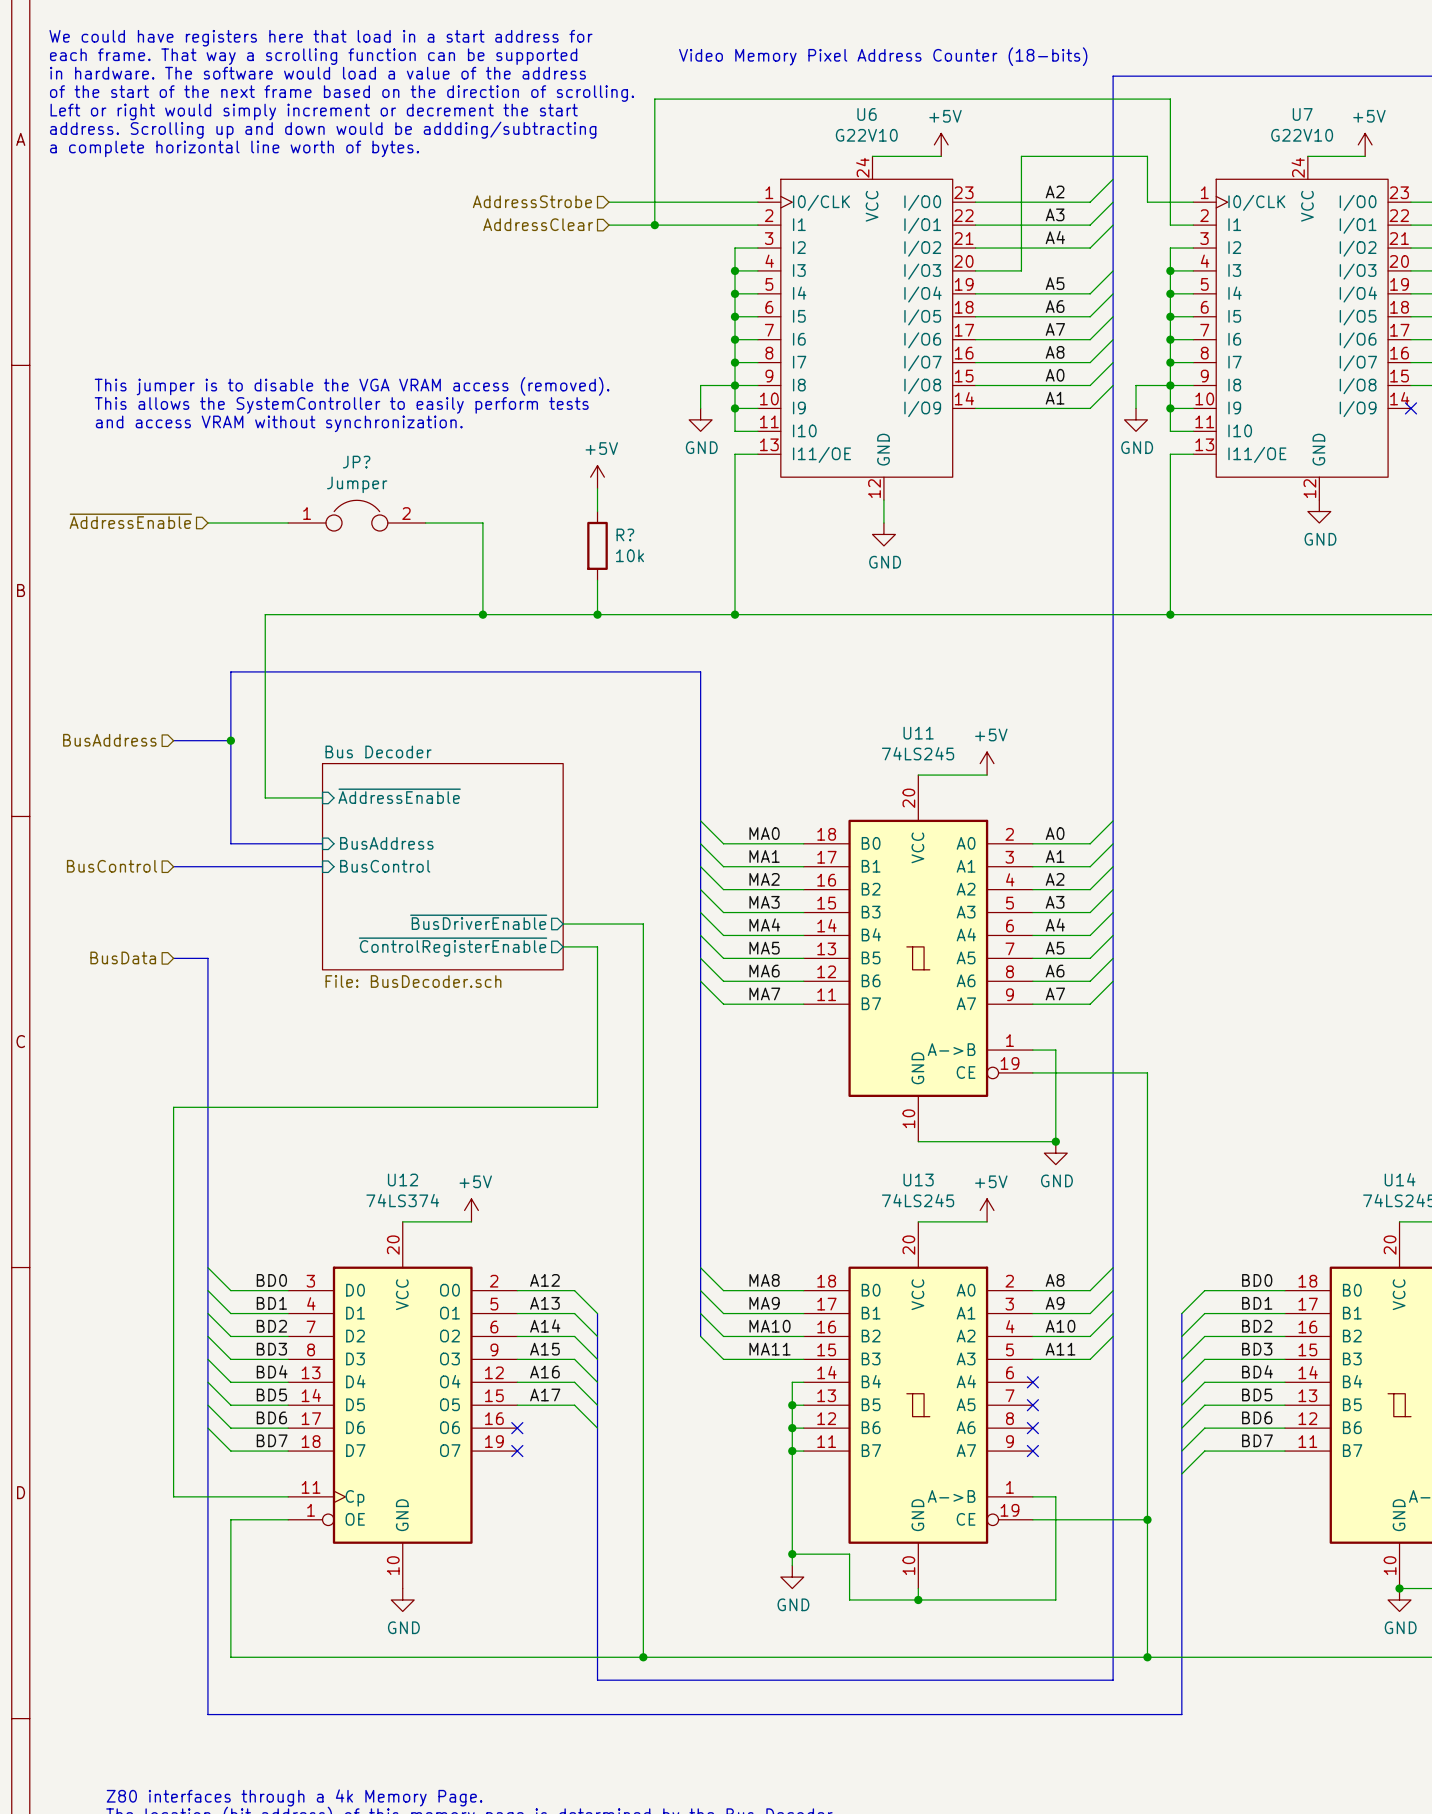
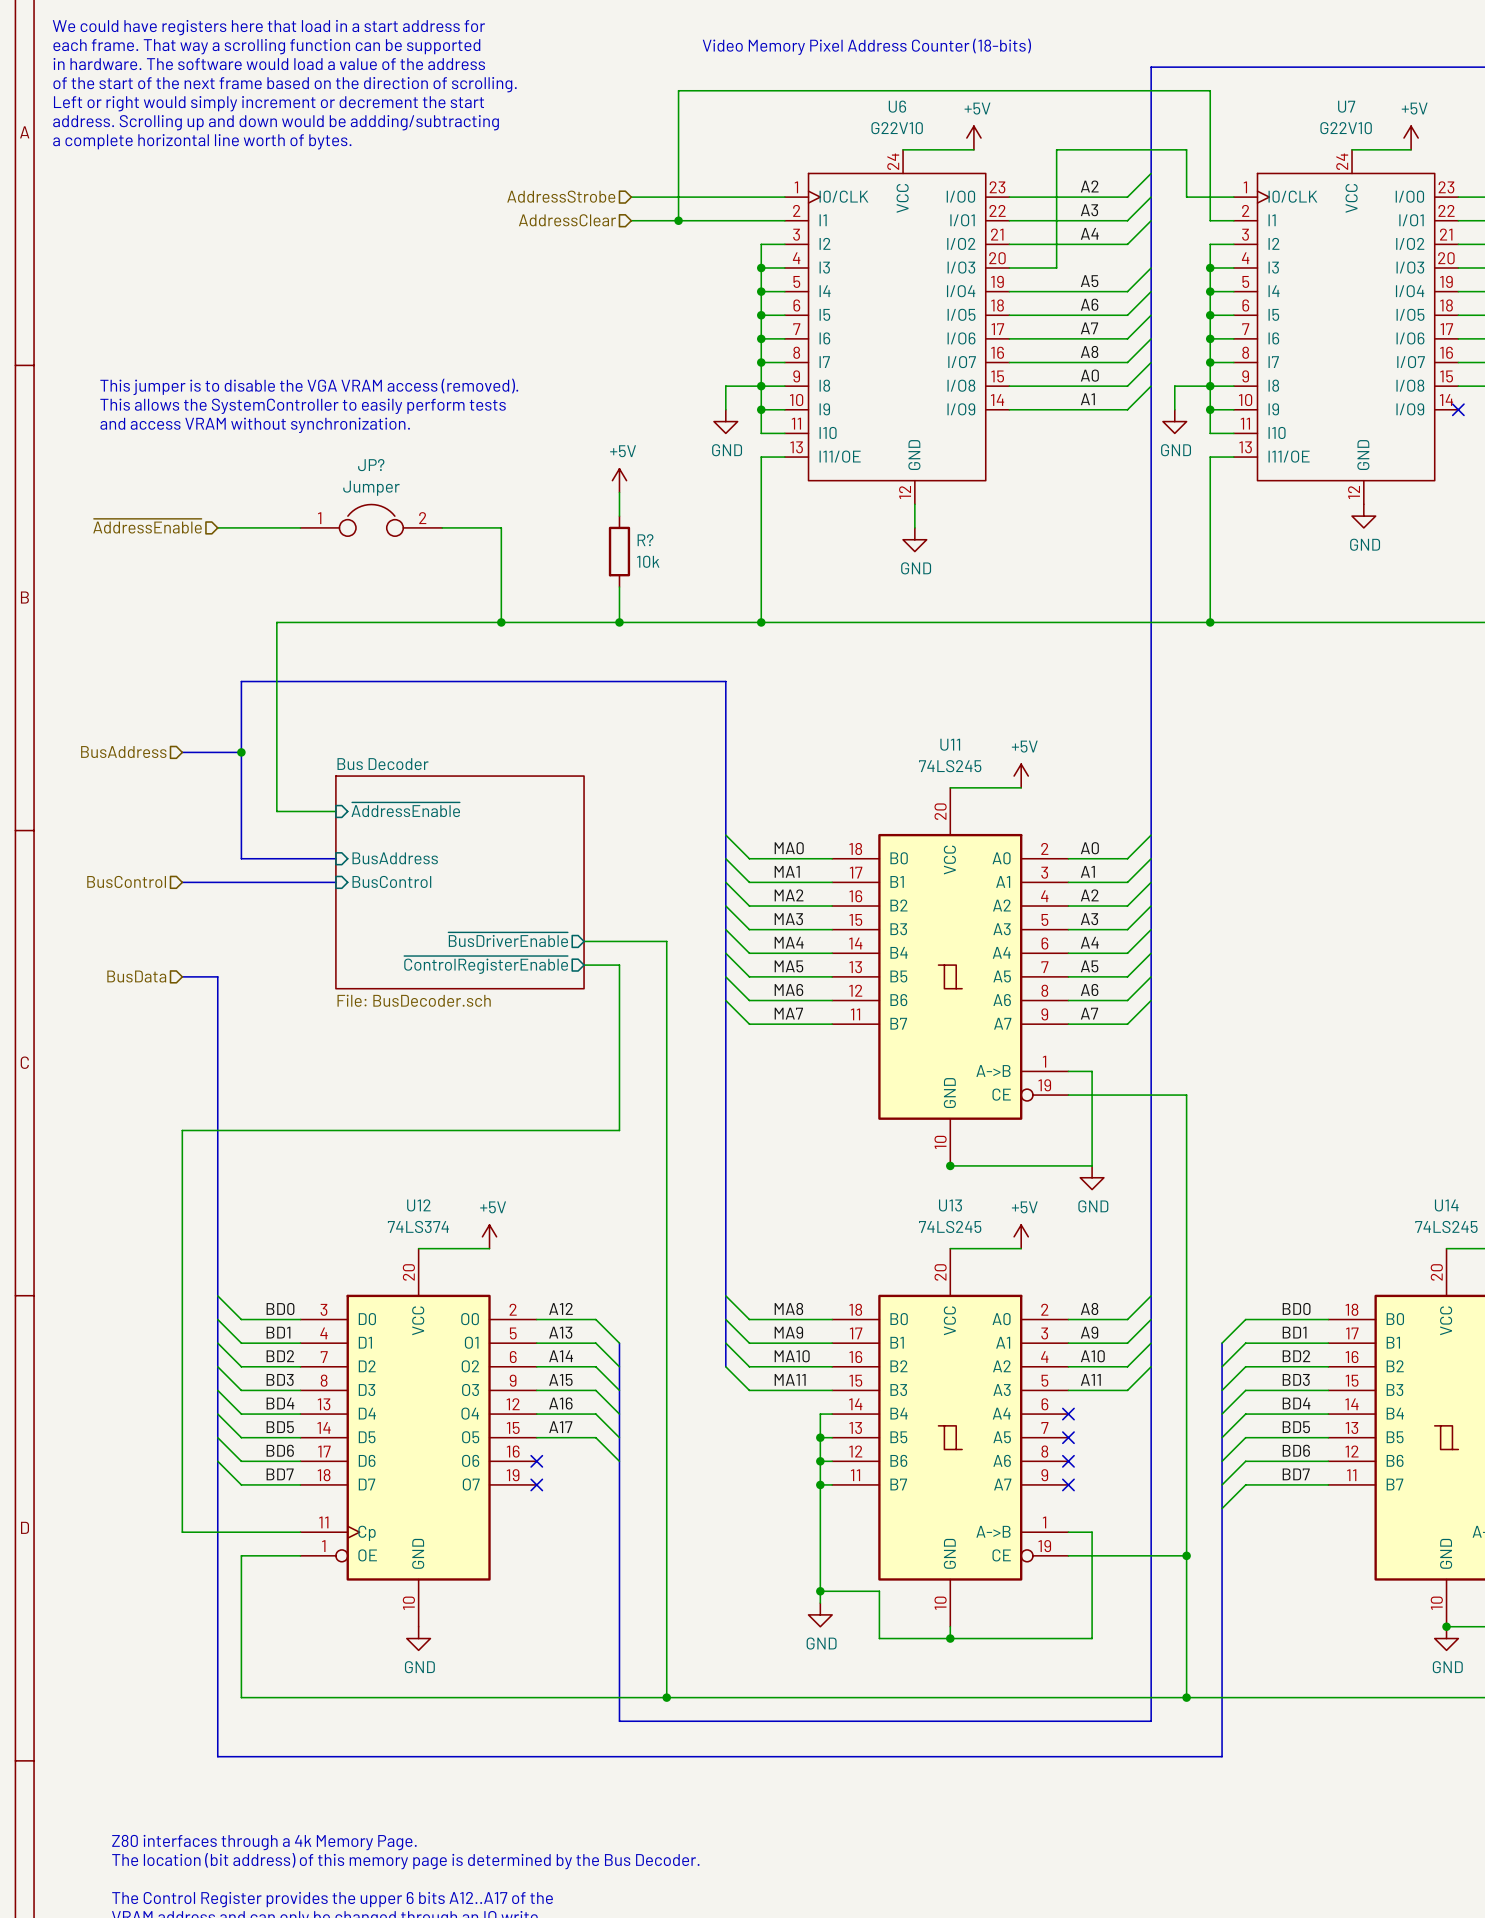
junction: none -> (950, 1165)
junction: (1055, 1141) -> none

